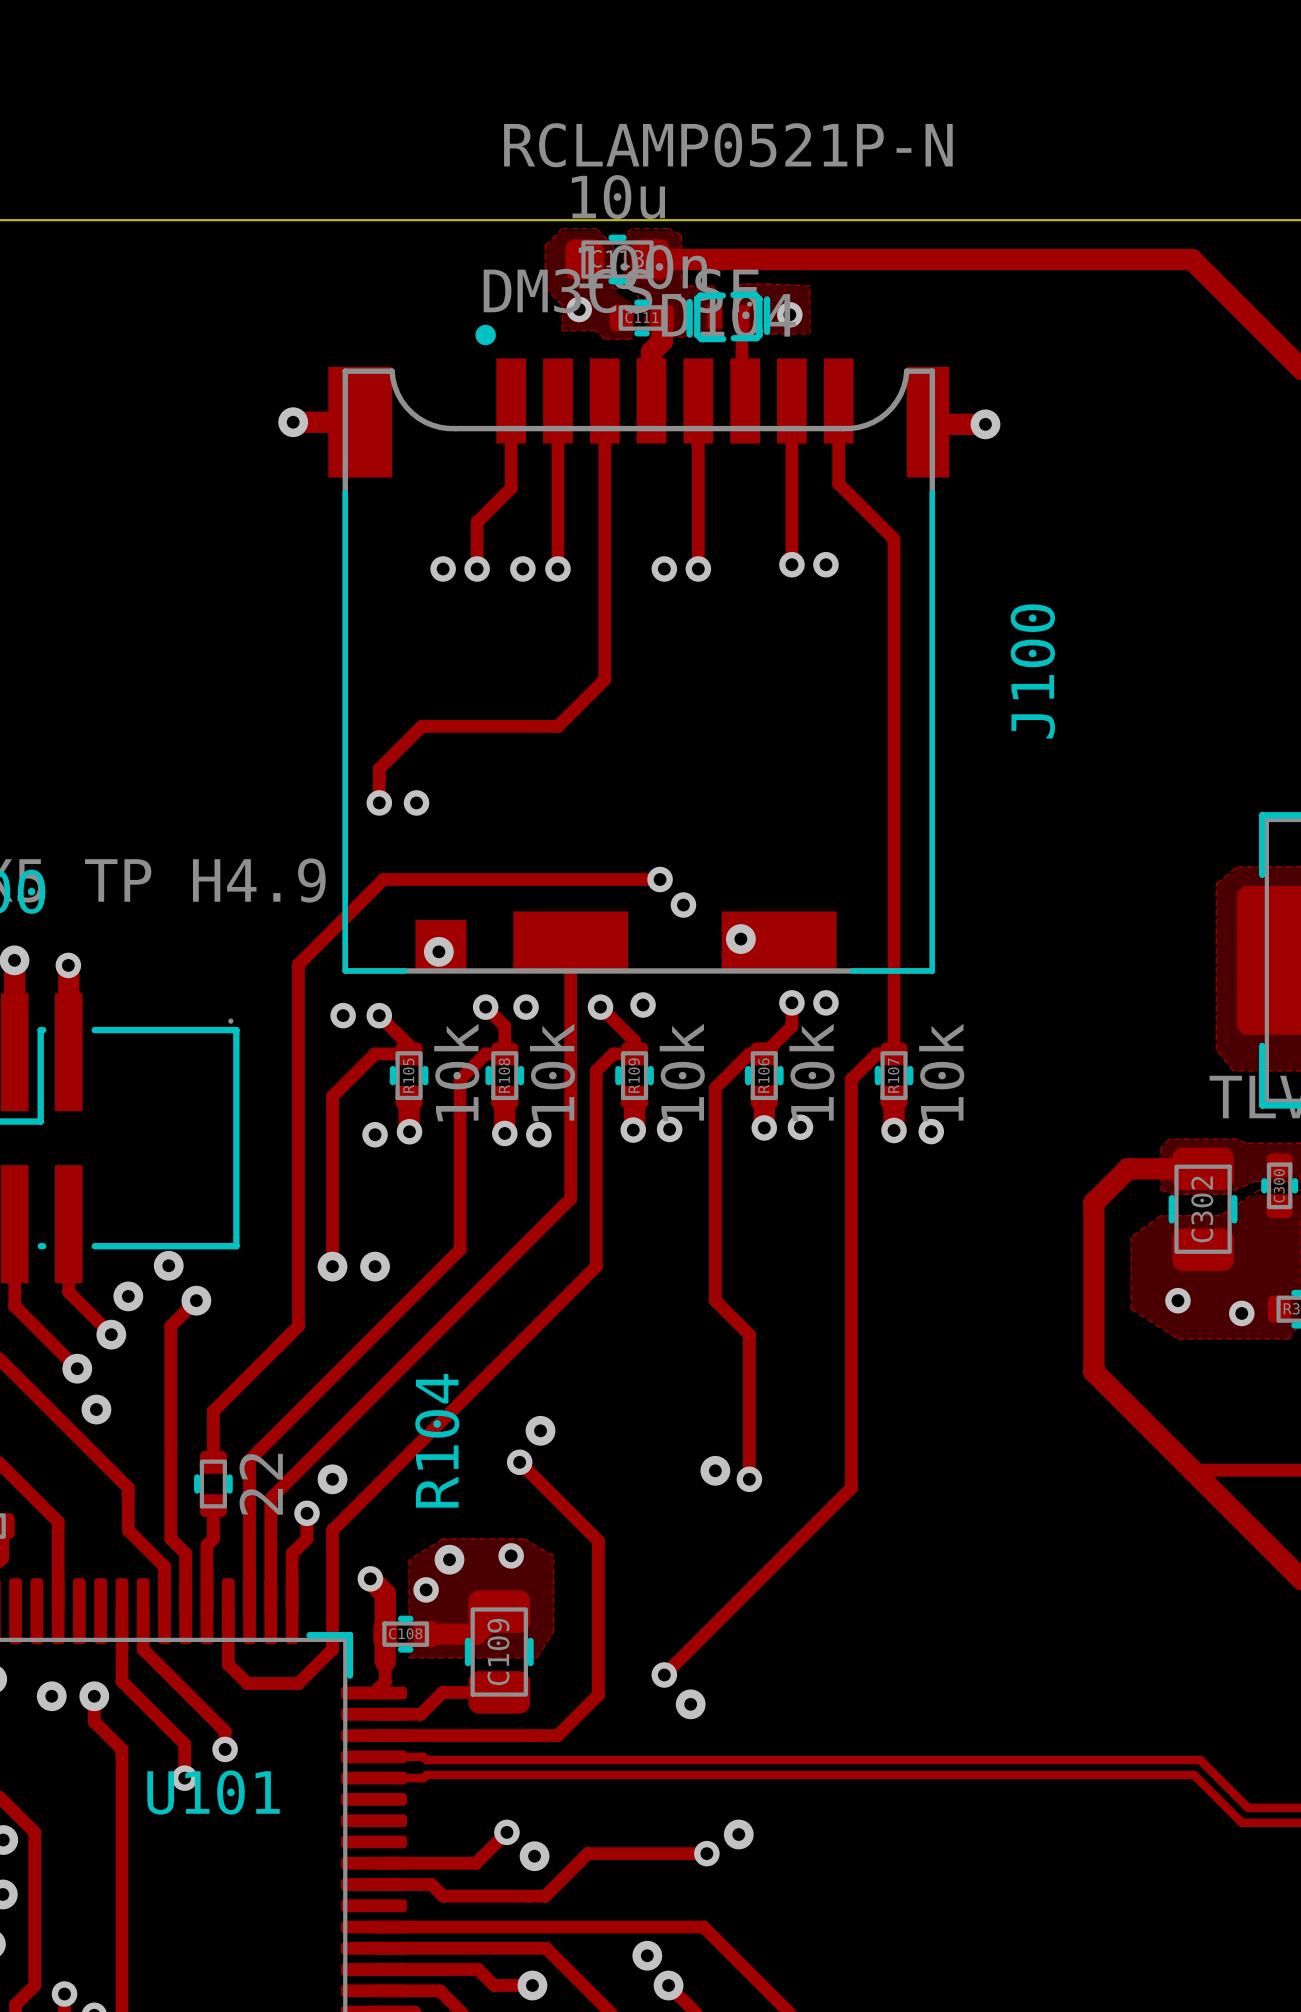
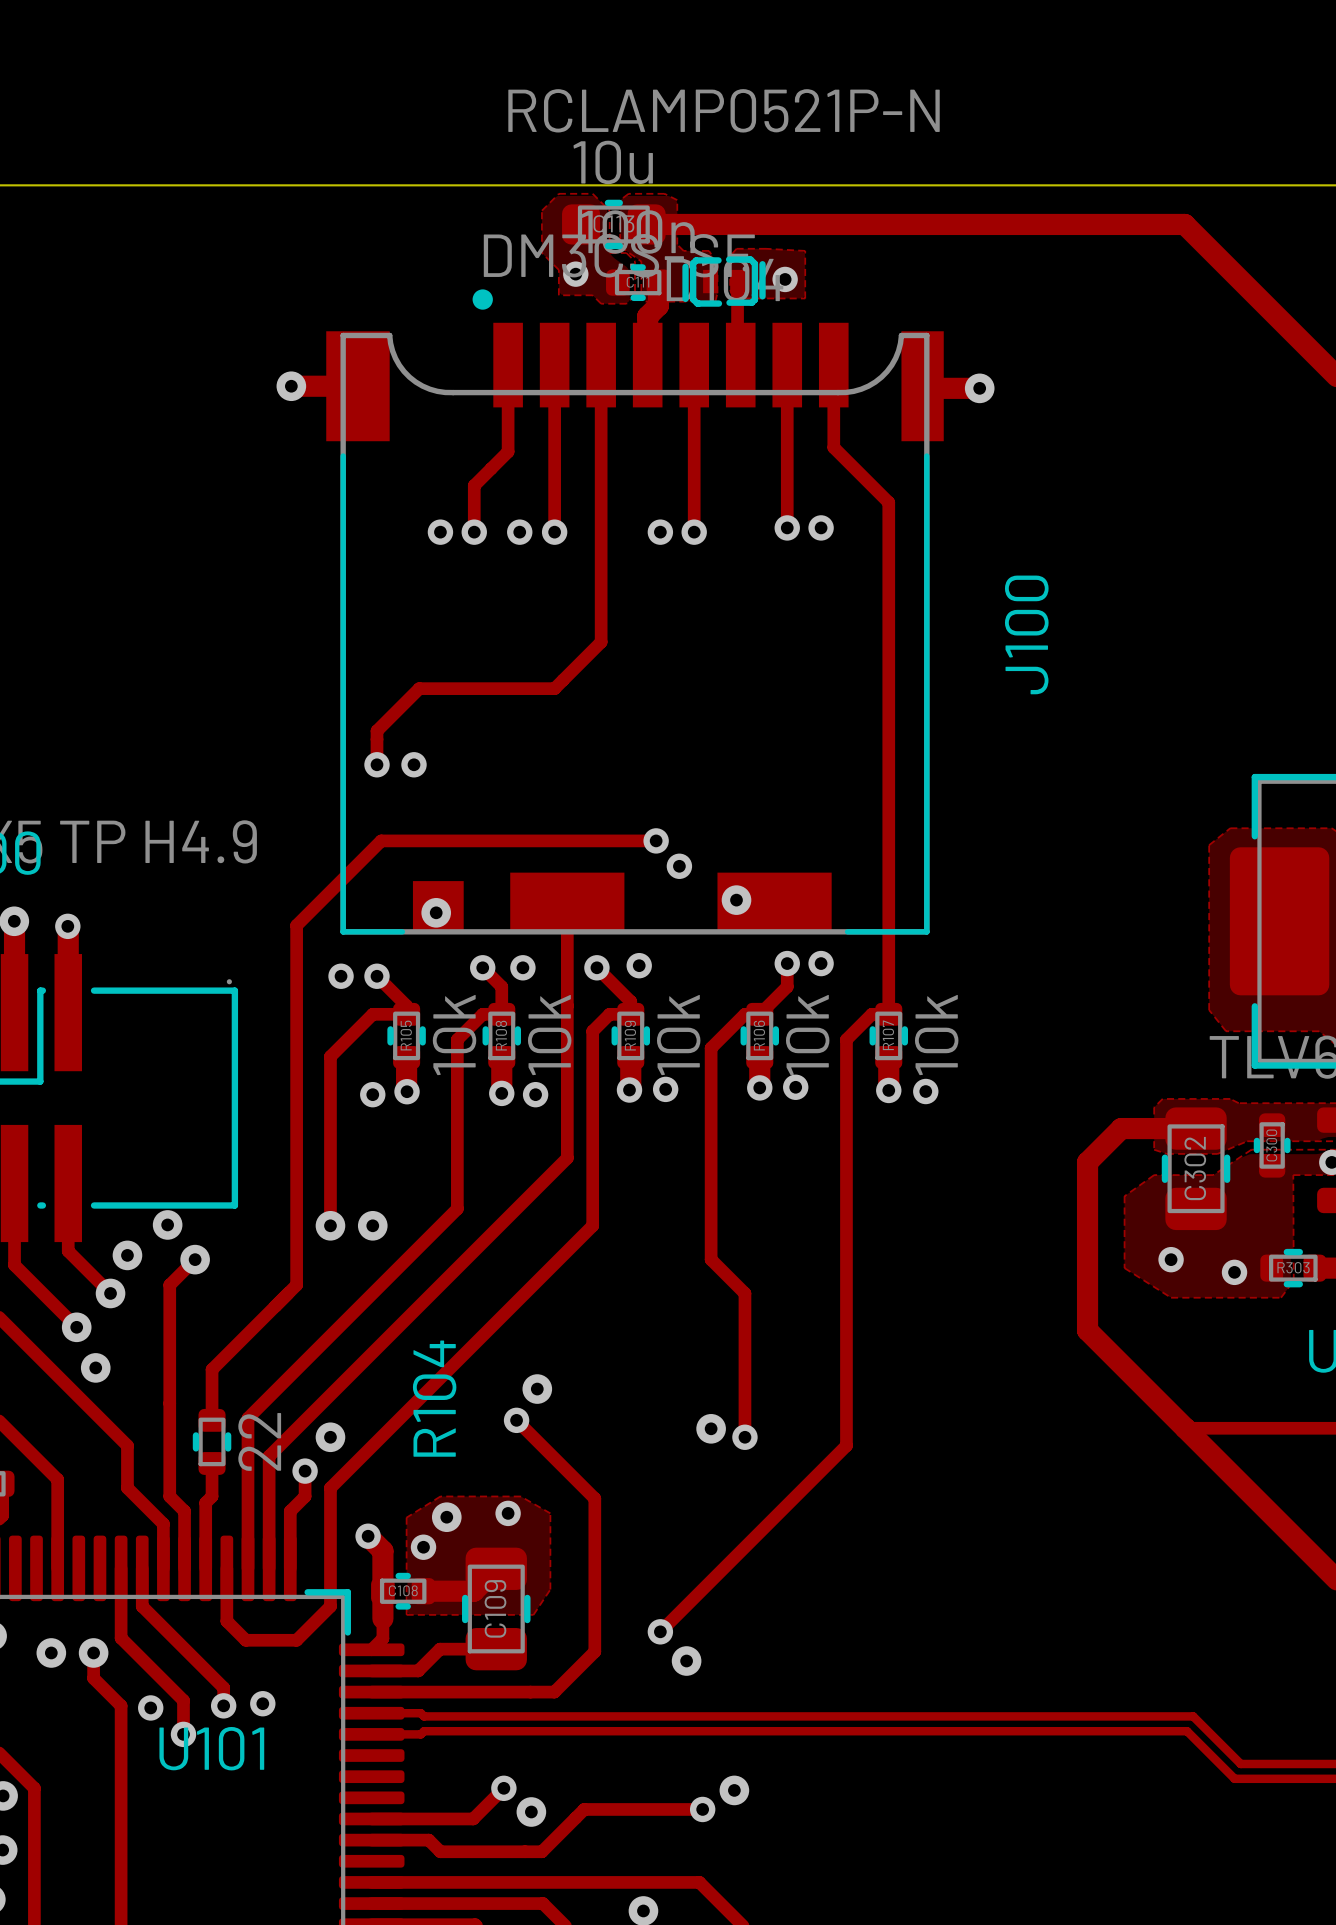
via: none -> (262, 1703)
via: none -> (150, 1707)

